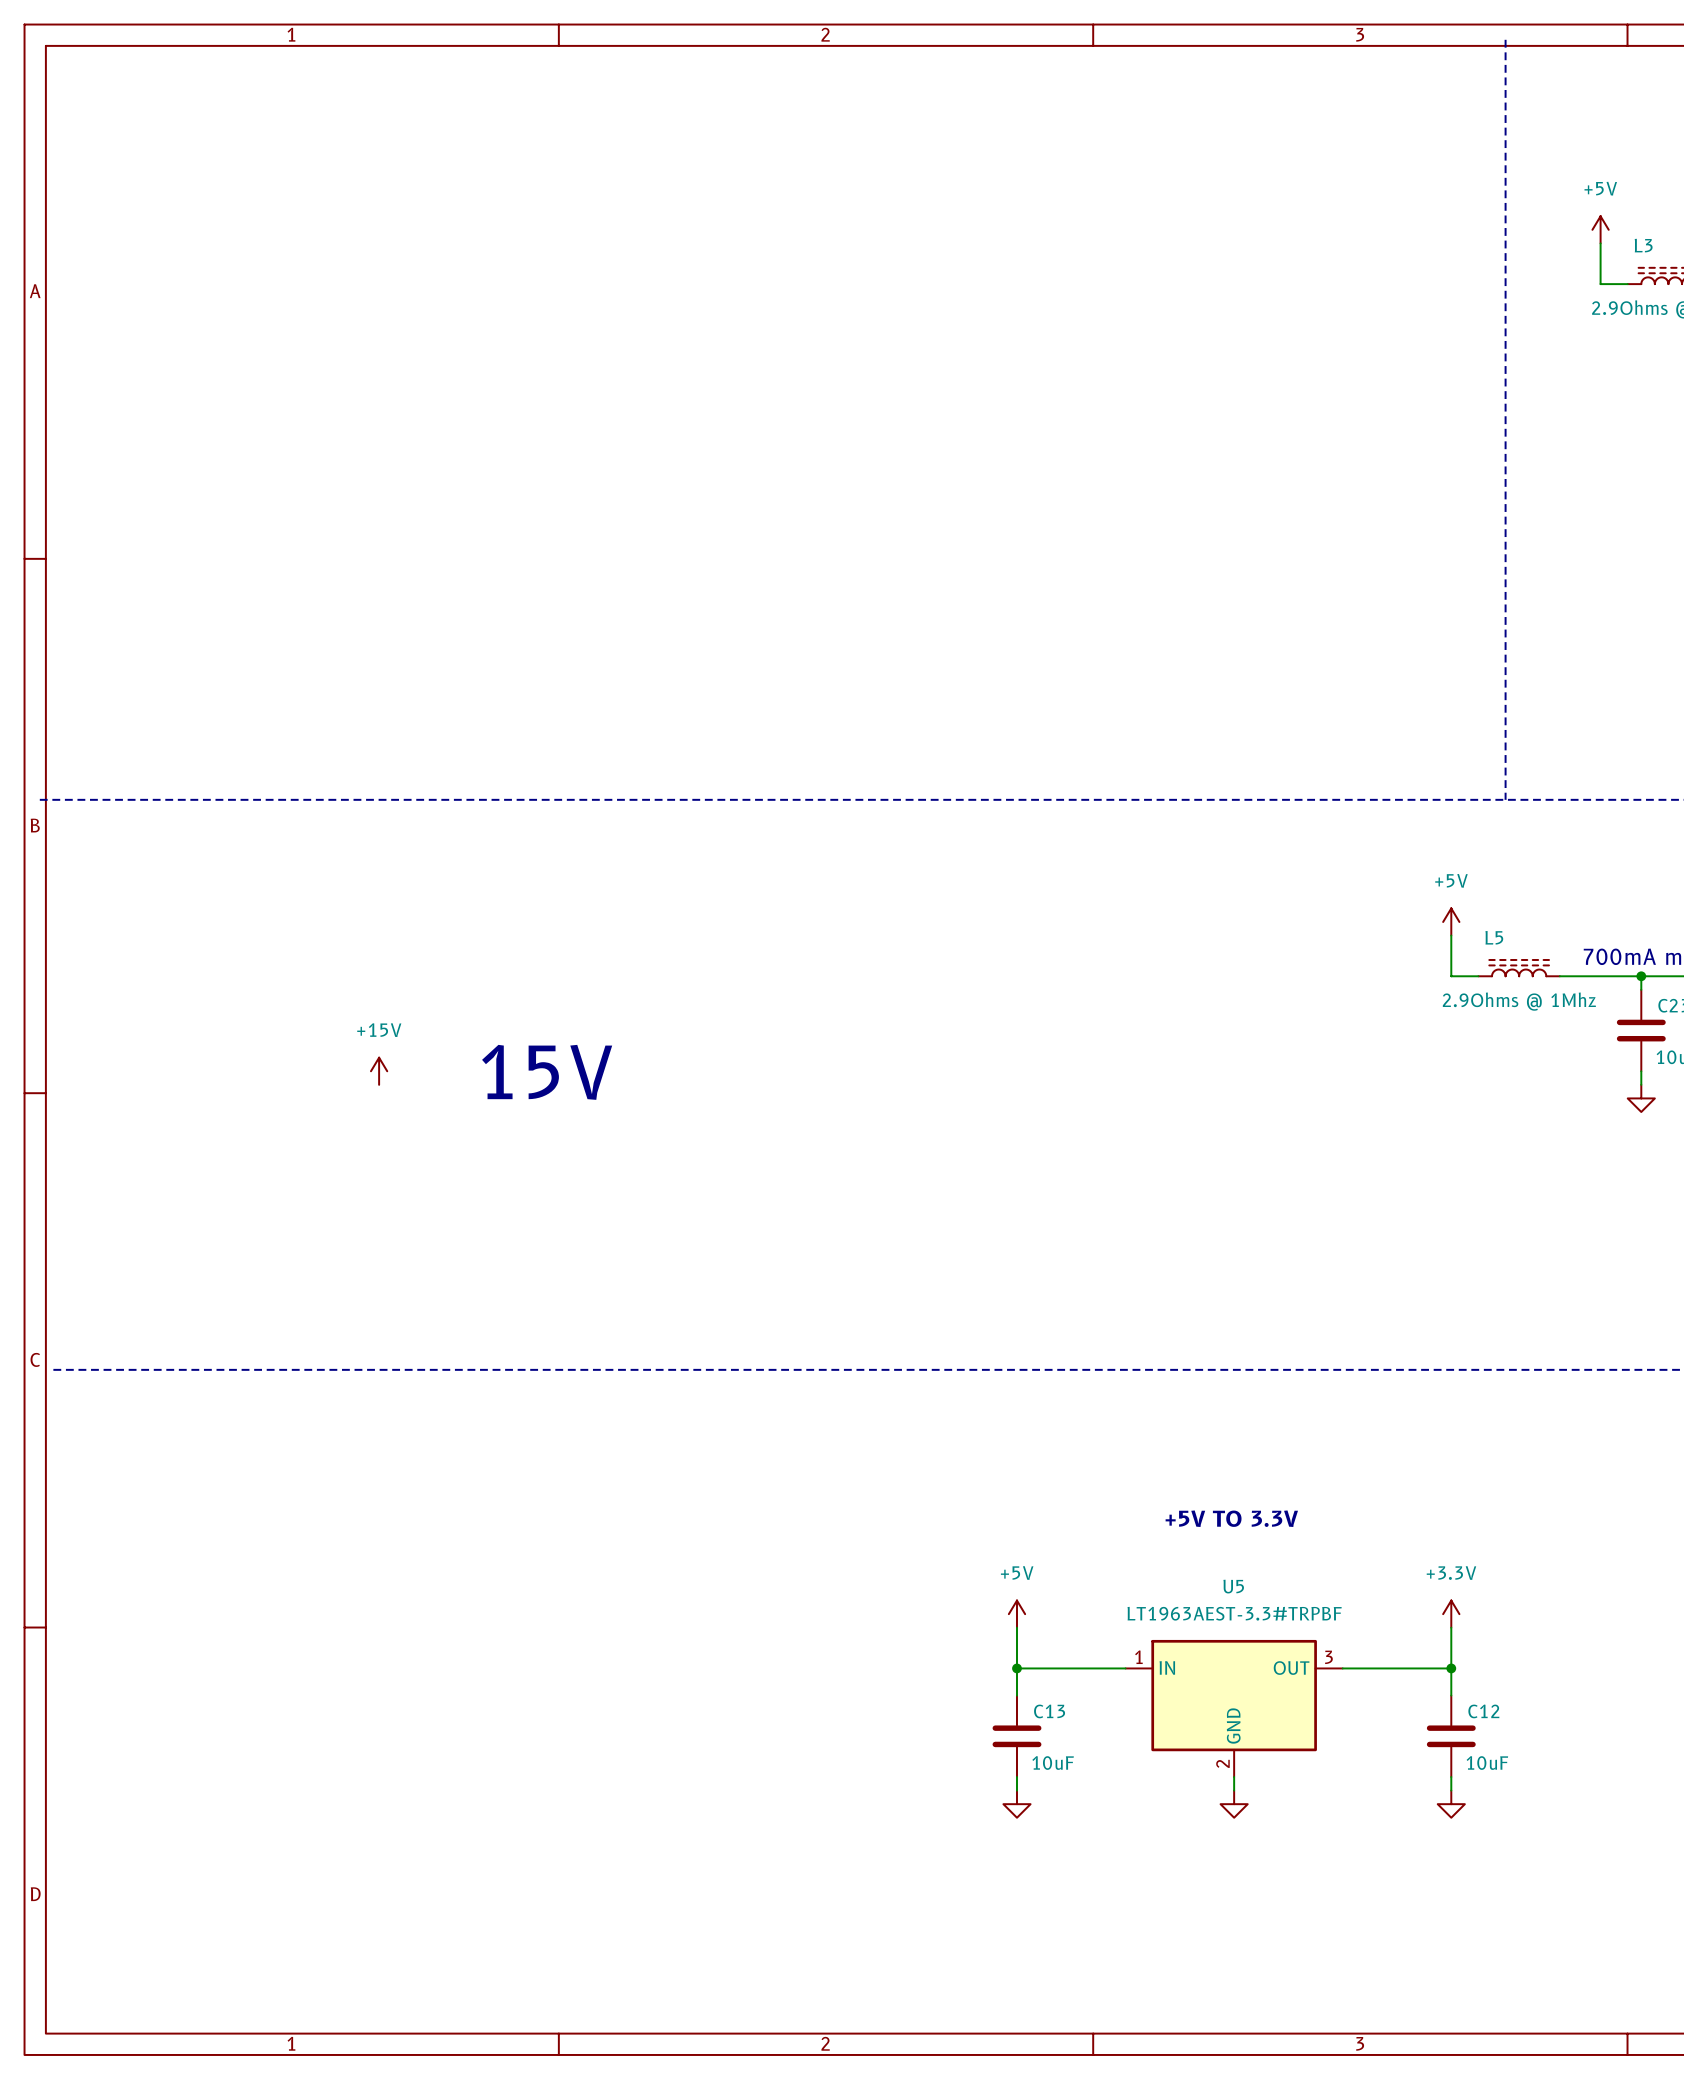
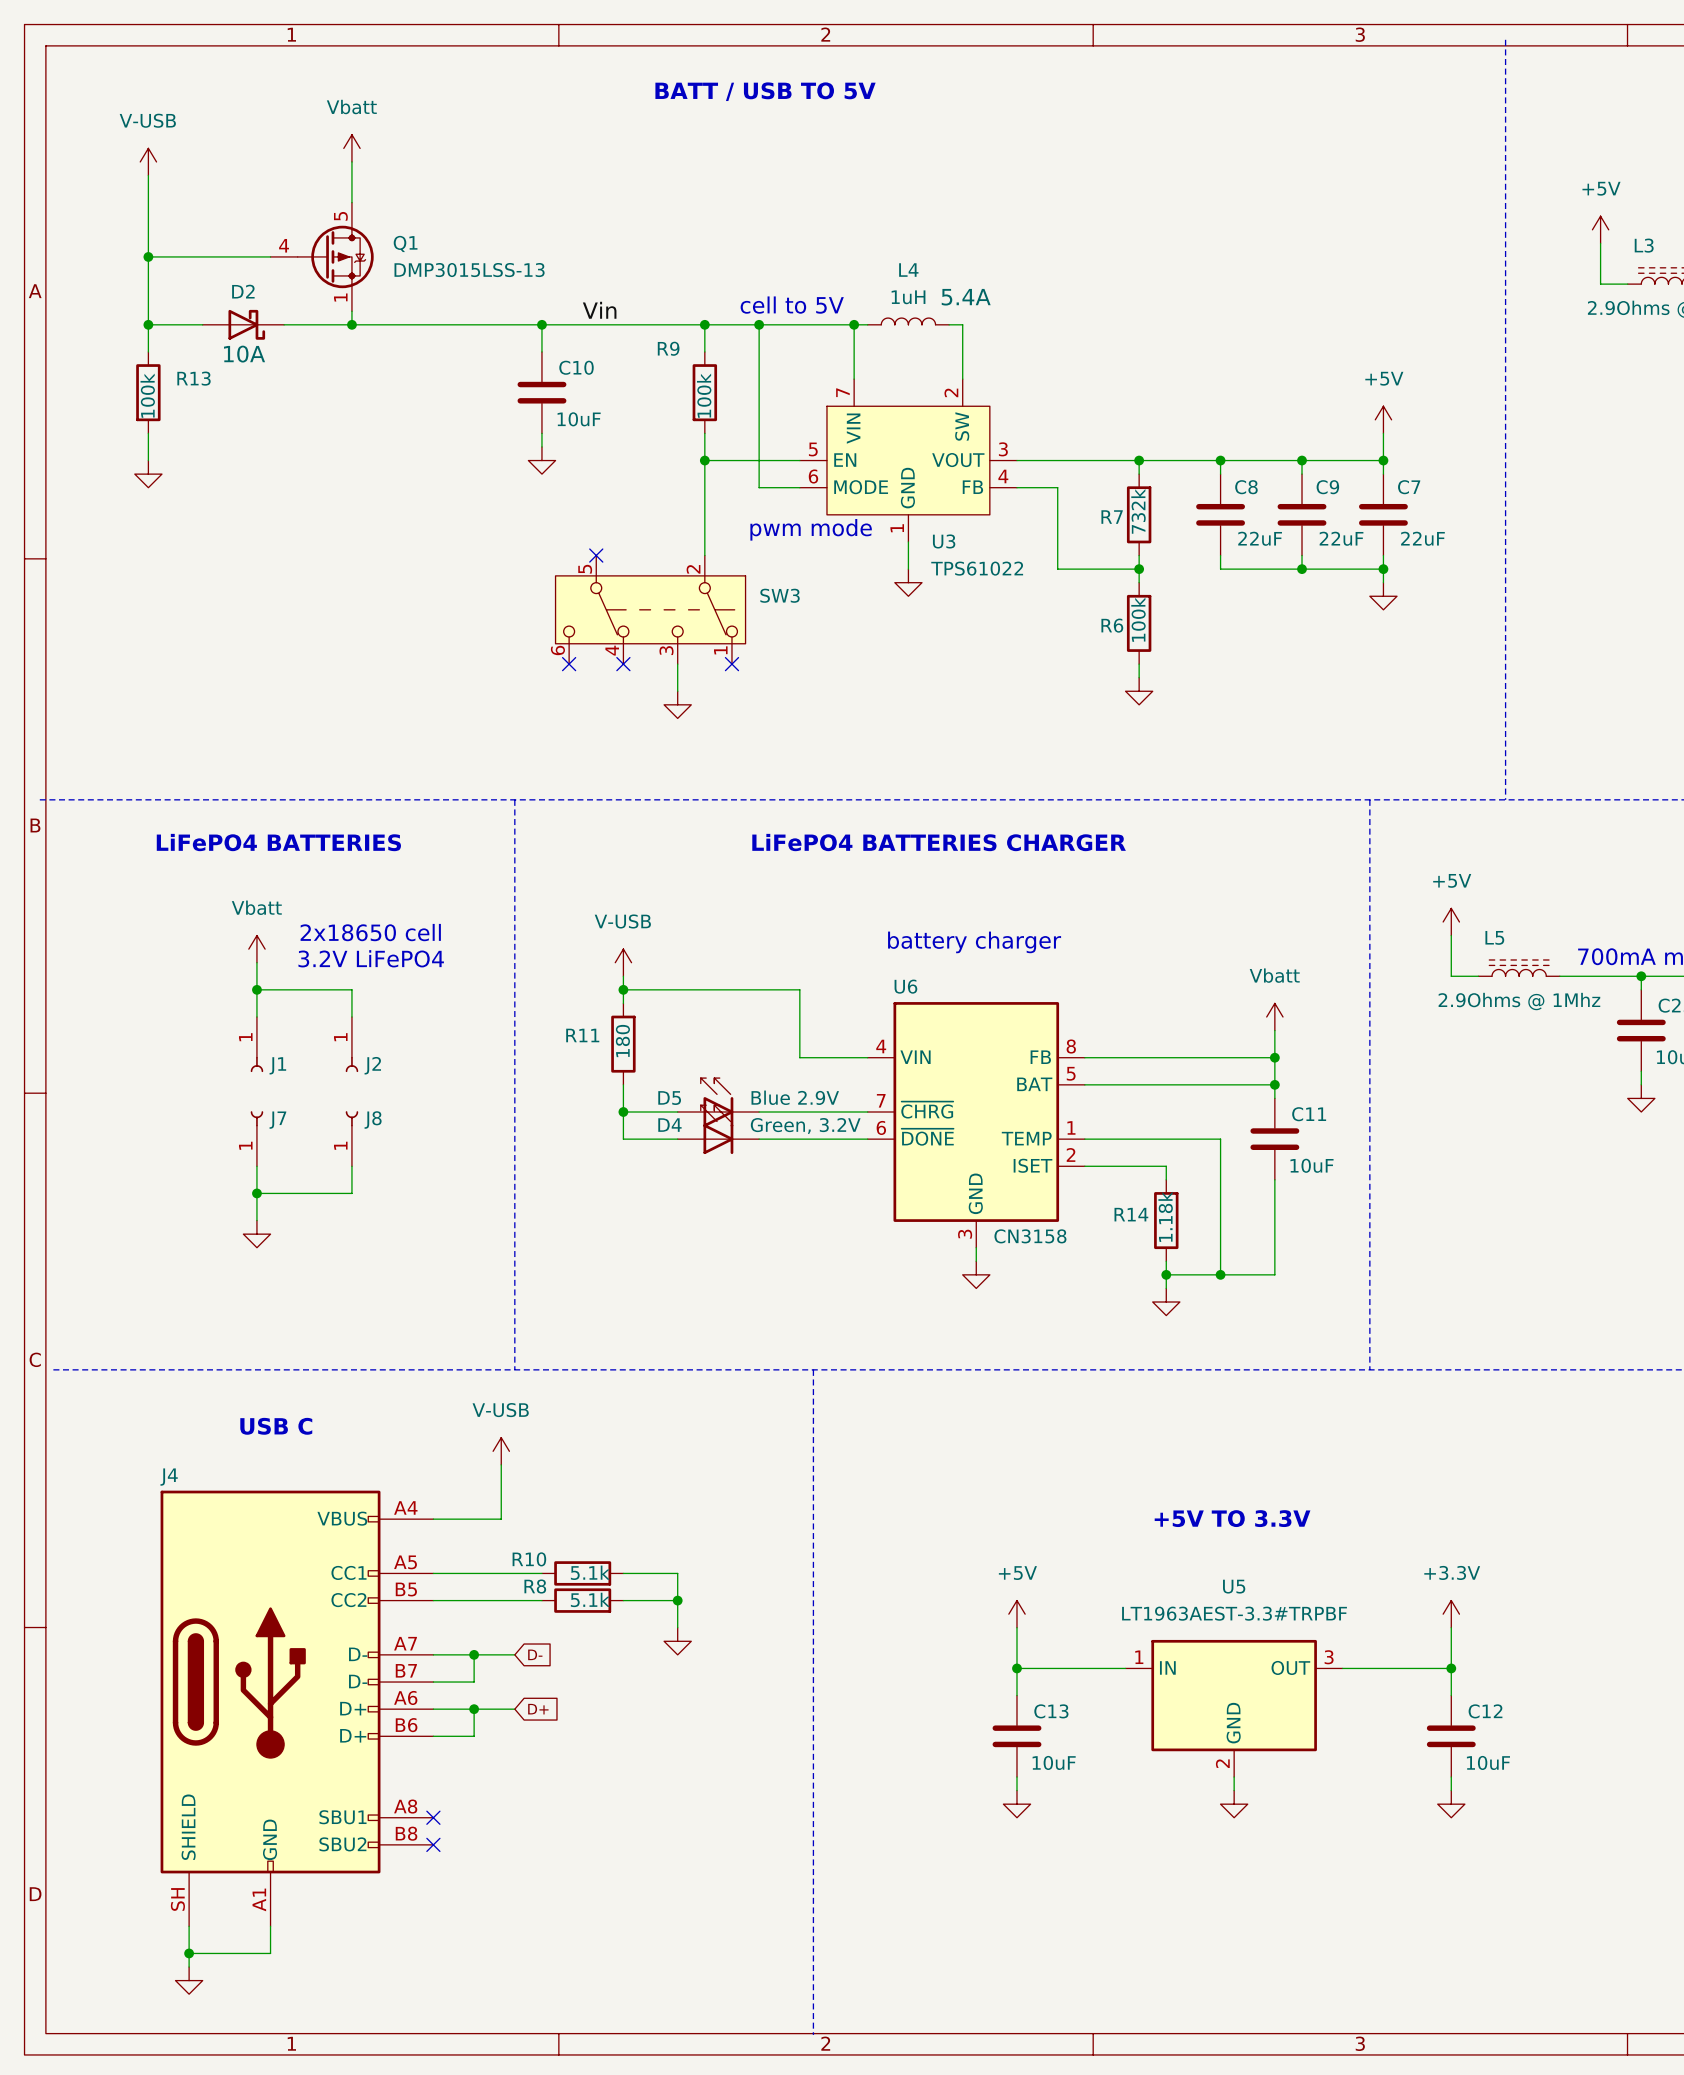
text: none -> BATT / USB TO 5V (765, 91)
power symbol: none -> Vbatt (351, 148)
power symbol: none -> V-USB (148, 161)
wire: none -> (351, 161) (351, 202)
wire: none -> (148, 175) (148, 351)
wire: none -> (148, 256) (270, 256)
junction: none -> (148, 256)
Q1: none -> DMP3015LSS-13 (322, 256)
text: none -> cell to 5V (792, 305)
label: none -> Vin (599, 310)
wire: none -> (351, 311) (351, 324)
L4: none -> 1uH (908, 321)
wire: none -> (148, 324) (202, 324)
junction: none -> (148, 324)
D2: none -> (243, 324)
wire: none -> (284, 324) (867, 324)
junction: none -> (351, 324)
wire: none -> (541, 324) (541, 351)
junction: none -> (541, 324)
wire: none -> (704, 324) (704, 351)
junction: none -> (704, 324)
wire: none -> (759, 324) (759, 487) (799, 487)
junction: none -> (759, 324)
wire: none -> (854, 324) (854, 379)
junction: none -> (854, 324)
wire: none -> (949, 324) (962, 324) (962, 379)
R13: none -> 100k (148, 392)
C10: none -> 10uF (541, 392)
R9: none -> 100k (704, 392)
power symbol: none -> +5V (1383, 419)
wire: none -> (148, 433) (148, 460)
wire: none -> (541, 433) (541, 446)
wire: none -> (704, 433) (704, 555)
wire: none -> (1383, 433) (1383, 474)
power symbol: none -> (541, 460)
wire: none -> (704, 460) (799, 460)
junction: none -> (704, 460)
U3: none -> TPS61022 (908, 460)
wire: none -> (1016, 460) (1383, 460)
wire: none -> (1139, 460) (1139, 474)
junction: none -> (1139, 460)
wire: none -> (1220, 460) (1220, 474)
junction: none -> (1220, 460)
wire: none -> (1302, 460) (1302, 474)
junction: none -> (1302, 460)
junction: none -> (1383, 460)
power symbol: none -> (148, 474)
wire: none -> (1016, 487) (1057, 487) (1057, 569) (1139, 569)
R7: none -> 732k (1139, 514)
C8: none -> 22uF (1220, 514)
C9: none -> 22uF (1302, 514)
C7: none -> 22uF (1383, 514)
text: none -> pwm mode (811, 529)
wire: none -> (908, 541) (908, 569)
no-connect mark: none -> (596, 555)
wire: none -> (1139, 555) (1139, 582)
wire: none -> (1220, 555) (1220, 569) (1383, 569)
wire: none -> (1302, 555) (1302, 569)
wire: none -> (1383, 555) (1383, 582)
junction: none -> (1139, 569)
junction: none -> (1302, 569)
junction: none -> (1383, 569)
power symbol: none -> (908, 582)
power symbol: none -> (1383, 596)
SW3: none -> (650, 609)
R6: none -> 100k (1139, 623)
no-connect mark: none -> (569, 664)
no-connect mark: none -> (623, 664)
wire: none -> (677, 664) (677, 691)
no-connect mark: none -> (731, 664)
wire: none -> (1139, 664) (1139, 677)
power symbol: none -> (1139, 691)
power symbol: none -> (677, 704)
line: none -> (514, 799) (514, 1369)
line: none -> (1369, 799) (1369, 1369)
text: none -> LiFePO4 BATTERIES (278, 842)
text: none -> LiFePO4 BATTERIES CHARGER (939, 842)
text: none -> 2x18650 cell (370, 932)
text: none -> battery charger (974, 942)
power symbol: none -> Vbatt (256, 949)
text: none -> 3.2V LiFePO4 (371, 958)
wire: none -> (256, 962) (256, 1016)
power symbol: none -> V-USB (623, 962)
wire: none -> (623, 976) (623, 1003)
wire: none -> (256, 989) (351, 989) (351, 1016)
junction: none -> (256, 989)
wire: none -> (623, 989) (799, 989) (799, 1057) (867, 1057)
junction: none -> (623, 989)
power symbol: none -> Vbatt (1274, 1016)
wire: none -> (1274, 1030) (1274, 1098)
J1: none -> (256, 1044)
J2: none -> (351, 1044)
R11: none -> 180 (623, 1044)
wire: none -> (1084, 1057) (1274, 1057)
junction: none -> (1274, 1057)
power symbol: +15V (379, 1071) -> none
text: 15V (547, 1072) -> none
wire: none -> (623, 1084) (623, 1139) (677, 1139)
wire: none -> (1084, 1084) (1274, 1084)
junction: none -> (1274, 1084)
D5: none -> Blue 2.9V (718, 1102)
wire: none -> (623, 1111) (677, 1111)
junction: none -> (623, 1111)
wire: none -> (759, 1111) (867, 1111)
U6: none -> CN3158 (976, 1124)
D4: none -> Green, 3.2V (718, 1129)
J7: none -> (256, 1138)
J8: none -> (351, 1138)
wire: none -> (759, 1139) (867, 1139)
wire: none -> (1084, 1139) (1220, 1139) (1220, 1274)
C11: none -> 10uF (1274, 1139)
wire: none -> (256, 1166) (256, 1220)
wire: none -> (351, 1166) (351, 1193) (256, 1193)
wire: none -> (1084, 1166) (1166, 1166) (1166, 1179)
wire: none -> (1274, 1179) (1274, 1274) (1166, 1274)
junction: none -> (256, 1193)
R14: none -> 1.18k (1166, 1220)
power symbol: none -> (256, 1234)
wire: none -> (976, 1247) (976, 1261)
wire: none -> (1166, 1261) (1166, 1288)
power symbol: none -> (976, 1274)
junction: none -> (1166, 1274)
junction: none -> (1220, 1274)
power symbol: none -> (1166, 1302)
line: none -> (813, 1369) (813, 2034)
text: none -> USB C (276, 1426)
power symbol: none -> V-USB (501, 1451)
wire: none -> (501, 1464) (501, 1519) (433, 1519)
wire: none -> (433, 1573) (541, 1573)
R10: none -> 5.1k (582, 1573)
wire: none -> (623, 1573) (677, 1573) (677, 1627)
wire: none -> (433, 1600) (541, 1600)
R8: none -> 5.1k (582, 1600)
wire: none -> (623, 1600) (677, 1600)
junction: none -> (677, 1600)
power symbol: none -> (677, 1641)
wire: none -> (433, 1654) (514, 1654)
wire: none -> (474, 1654) (474, 1682) (433, 1682)
junction: none -> (474, 1654)
global label: none -> D- (535, 1654)
J4: none -> (297, 1708)
wire: none -> (433, 1709) (514, 1709)
wire: none -> (474, 1709) (474, 1736) (433, 1736)
junction: none -> (474, 1709)
global label: none -> D+ (538, 1709)
no-connect mark: none -> (433, 1817)
no-connect mark: none -> (433, 1844)
wire: none -> (189, 1926) (189, 1967)
wire: none -> (270, 1926) (270, 1953) (189, 1953)
junction: none -> (189, 1953)
power symbol: none -> (189, 1980)

